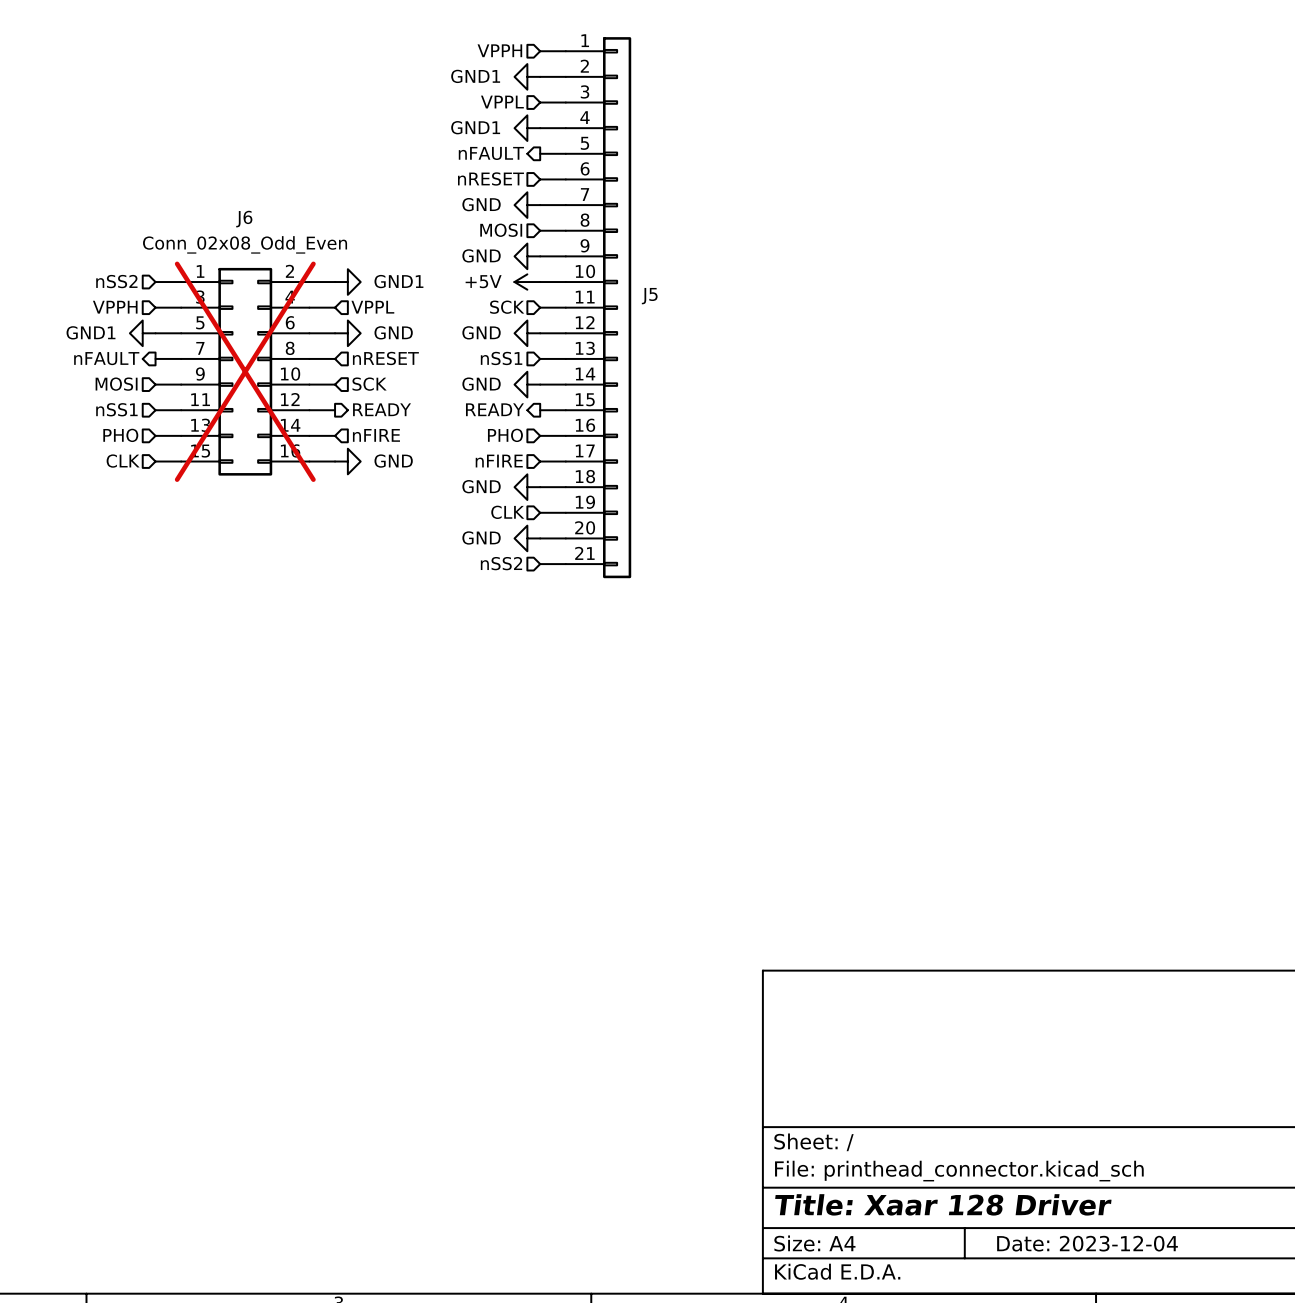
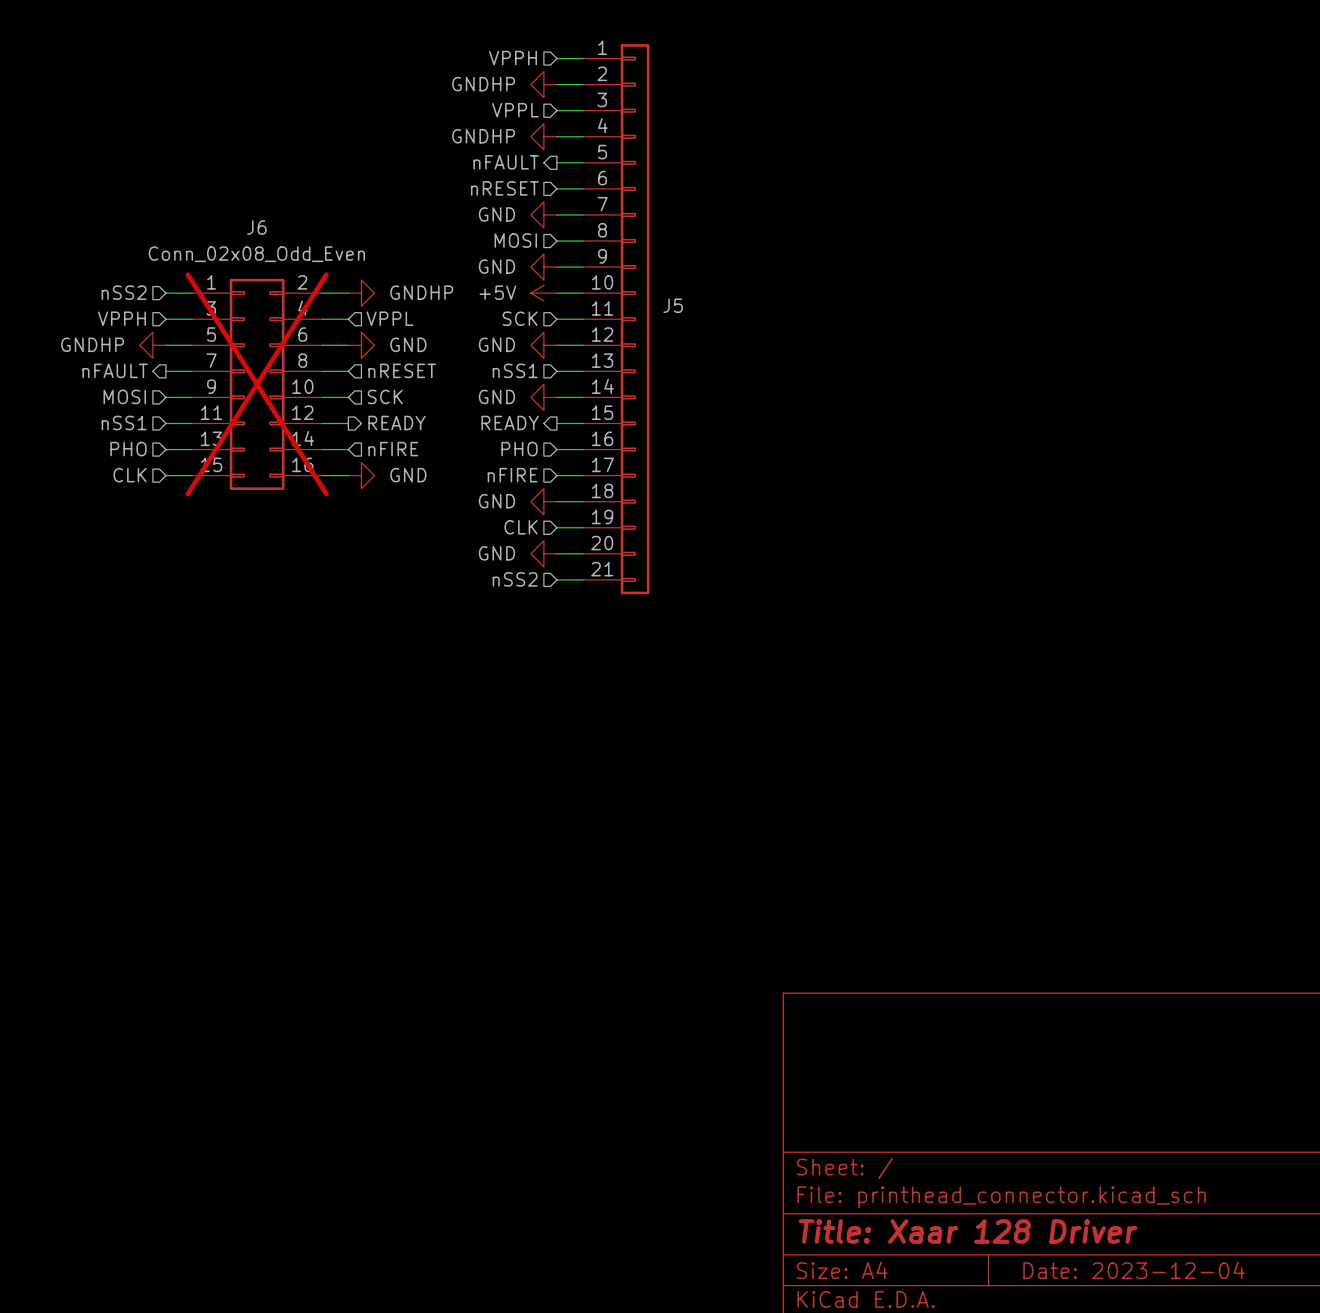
power symbol: GND1 (527, 76) -> GNDHP (543, 84)
power symbol: GND1 (527, 128) -> GNDHP (543, 136)
power symbol: GND1 (347, 282) -> GNDHP (361, 293)
power symbol: GND1 (142, 333) -> GNDHP (152, 345)

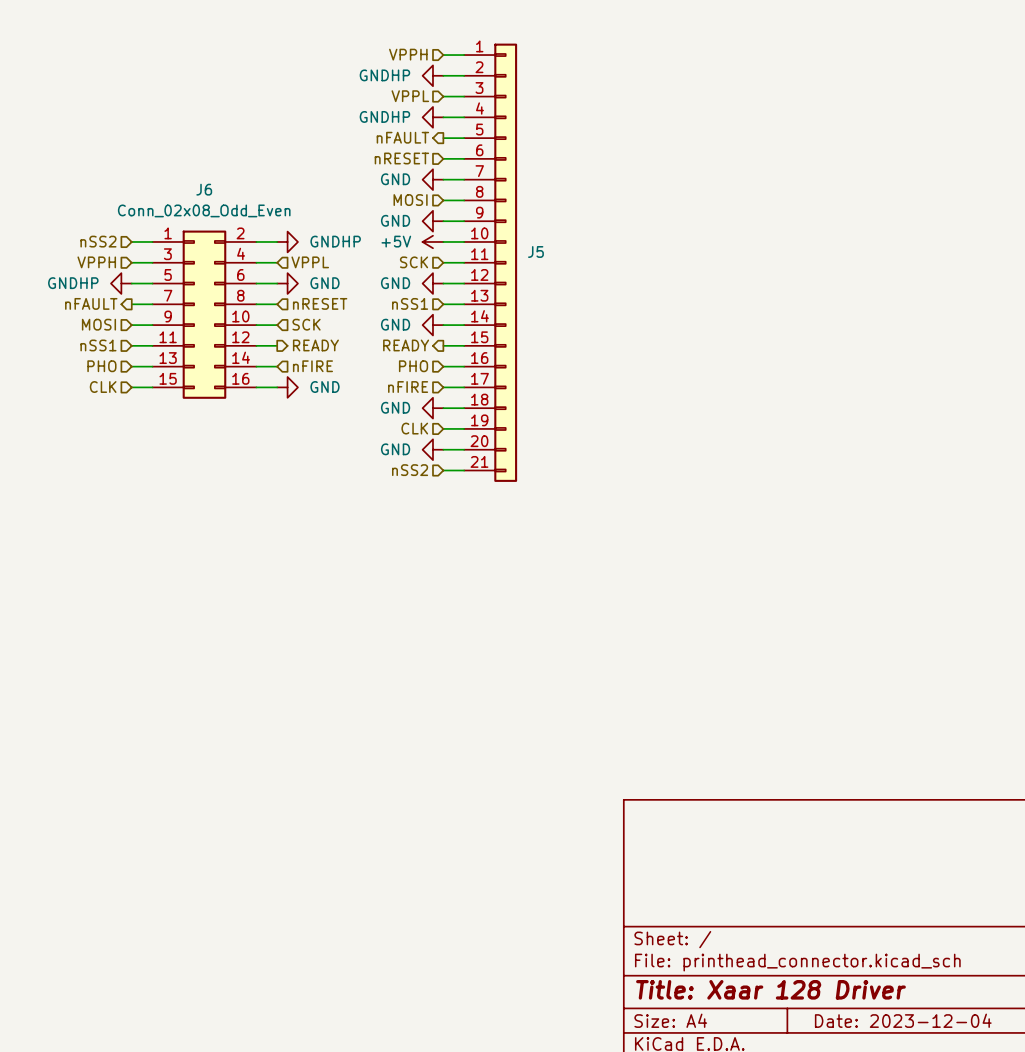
J6 do-not-place cross: (257, 384) -> none

